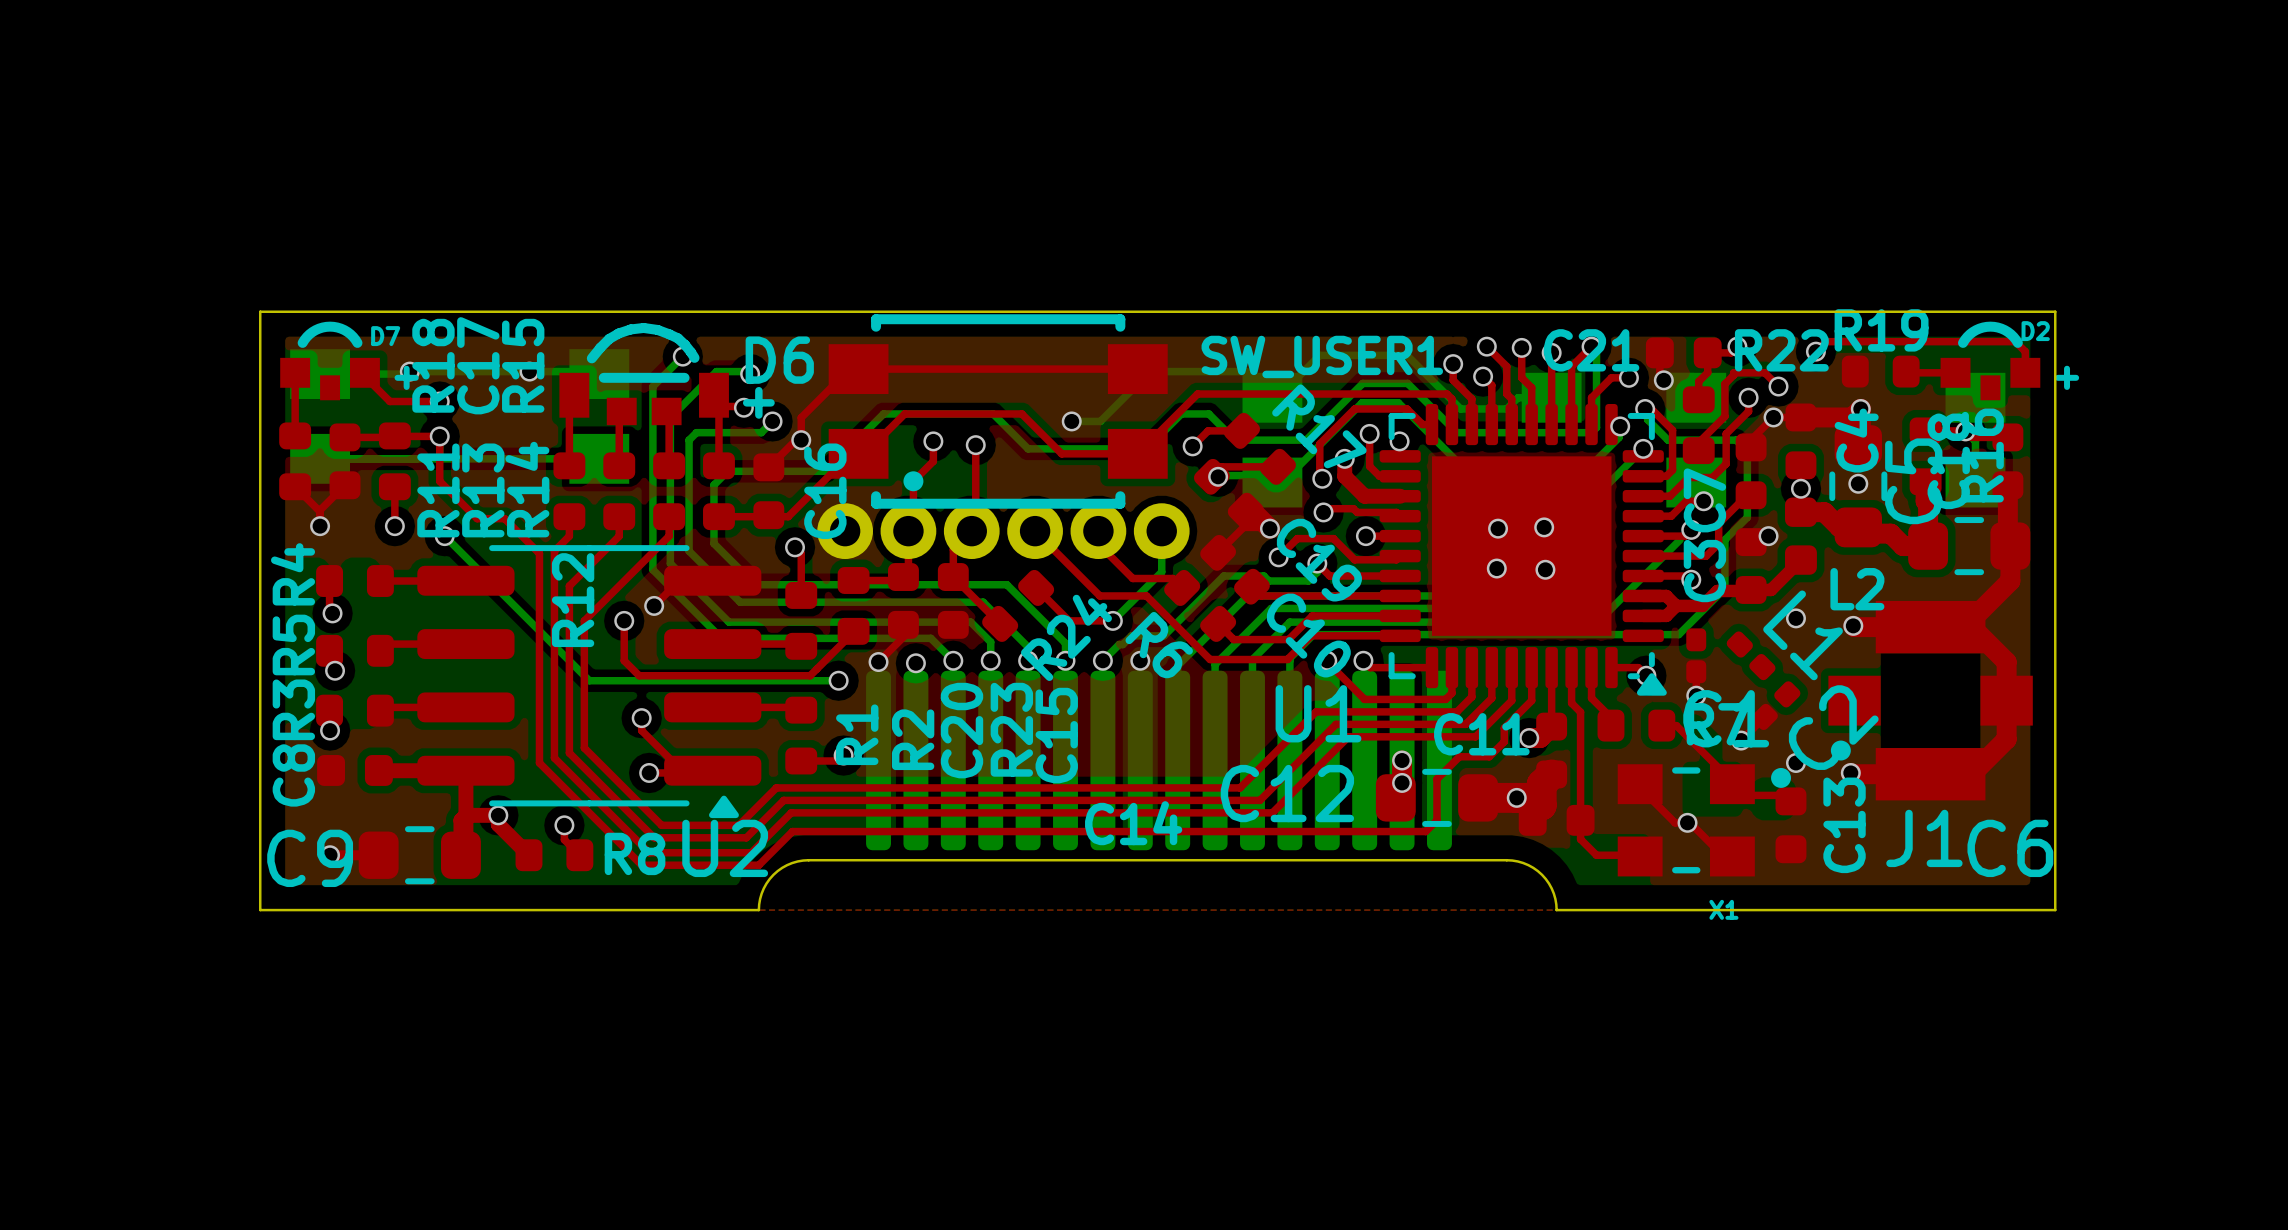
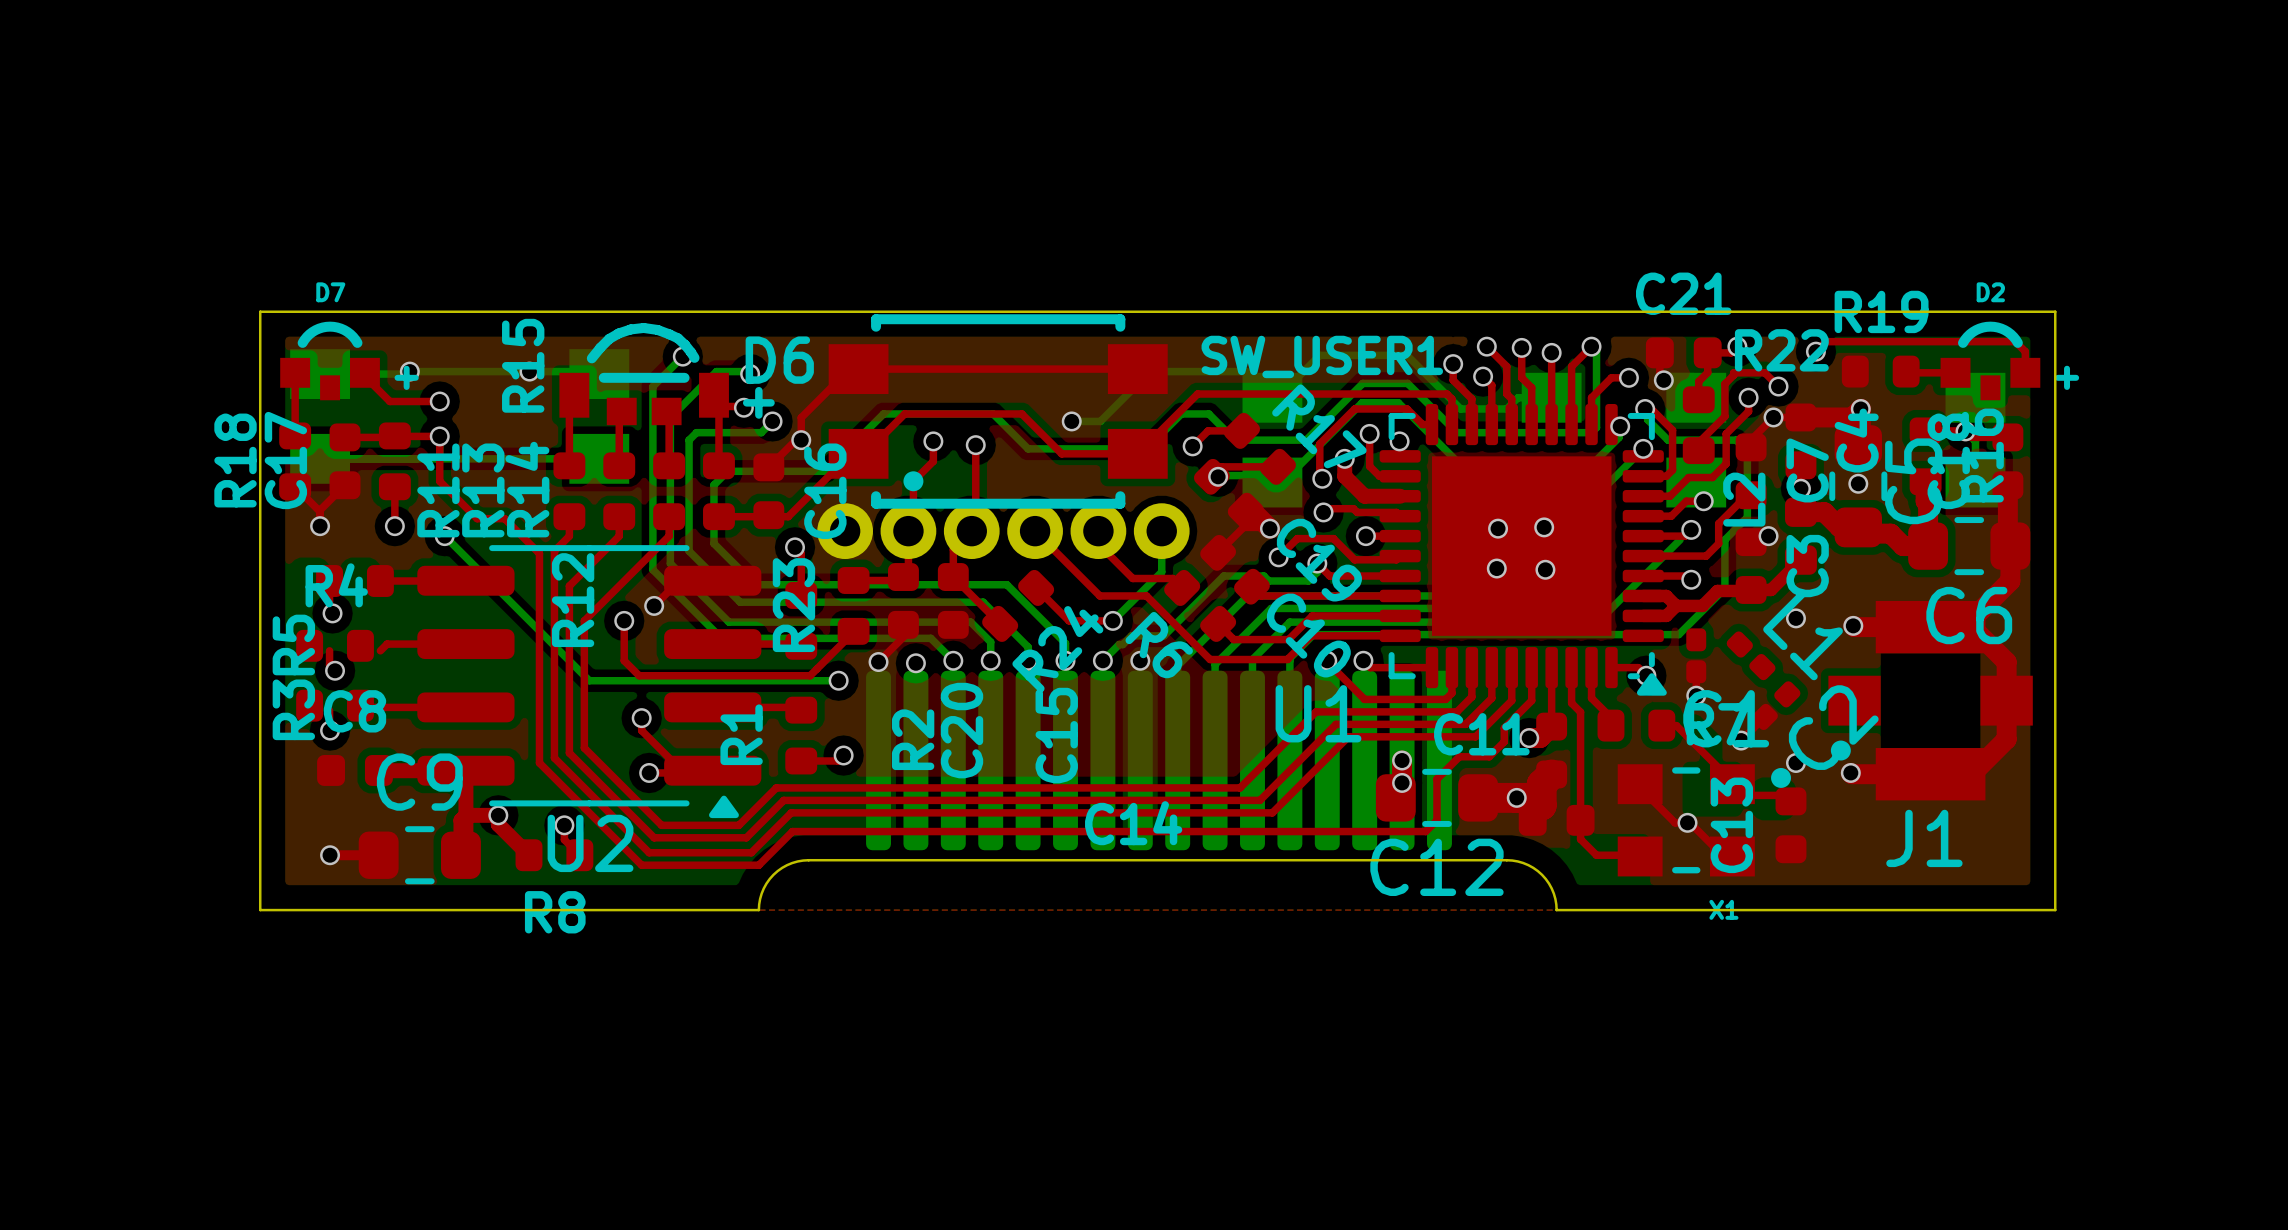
R19 name position: R19 (1881, 330) -> R19 (1881, 311)
D2 name position: D2 (2035, 331) -> D2 (1990, 292)
D7 name position: D7 (385, 336) -> D7 (330, 292)
C21 name position: C21 (1591, 350) -> C21 (1683, 293)
R18 name position: R18 (433, 365) -> R18 (235, 460)
C17 name position: C17 (478, 365) -> C17 (285, 460)
C7 name position: C7 (1704, 500) -> C7 (1807, 470)
C3 name position: C3 (1704, 571) -> C3 (1807, 566)
R4 name rotation: 0° (293, 574) -> 90° clockwise (336, 585)
L2 name rotation: 0° (1857, 589) -> 90° counterclockwise (1744, 499)
L2 name position: L2 (1857, 589) -> L2 (1744, 499)
R24 name position: R24 (1066, 637) -> R24 (1057, 649)
R4 position: (354, 650) -> (335, 645)
R3 position: (354, 710) -> (335, 705)
R23 name position: R23 (1011, 729) -> R23 (793, 605)
R1 name position: R1 (857, 734) -> R1 (741, 734)
C8 name rotation: 0° (293, 775) -> 90° clockwise (354, 711)
C12 name position: C12 (1287, 793) -> C12 (1436, 867)
C13 name position: C13 (1844, 825) -> C13 (1731, 825)
U2 name position: U2 (725, 848) -> U2 (590, 843)
C6 name position: C6 (2010, 848) -> C6 (1969, 615)
R8 name position: R8 (635, 853) -> R8 (555, 912)
C9 name position: C9 (310, 858) -> C9 (419, 782)

